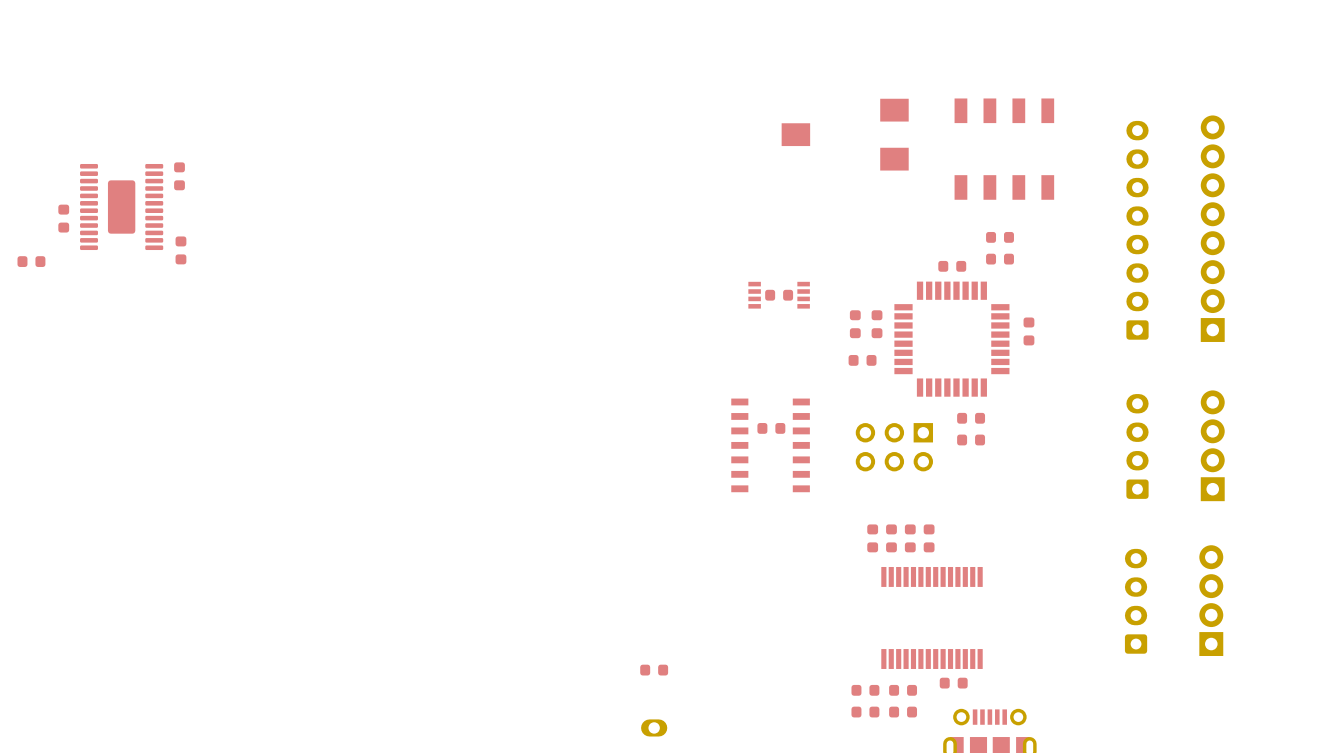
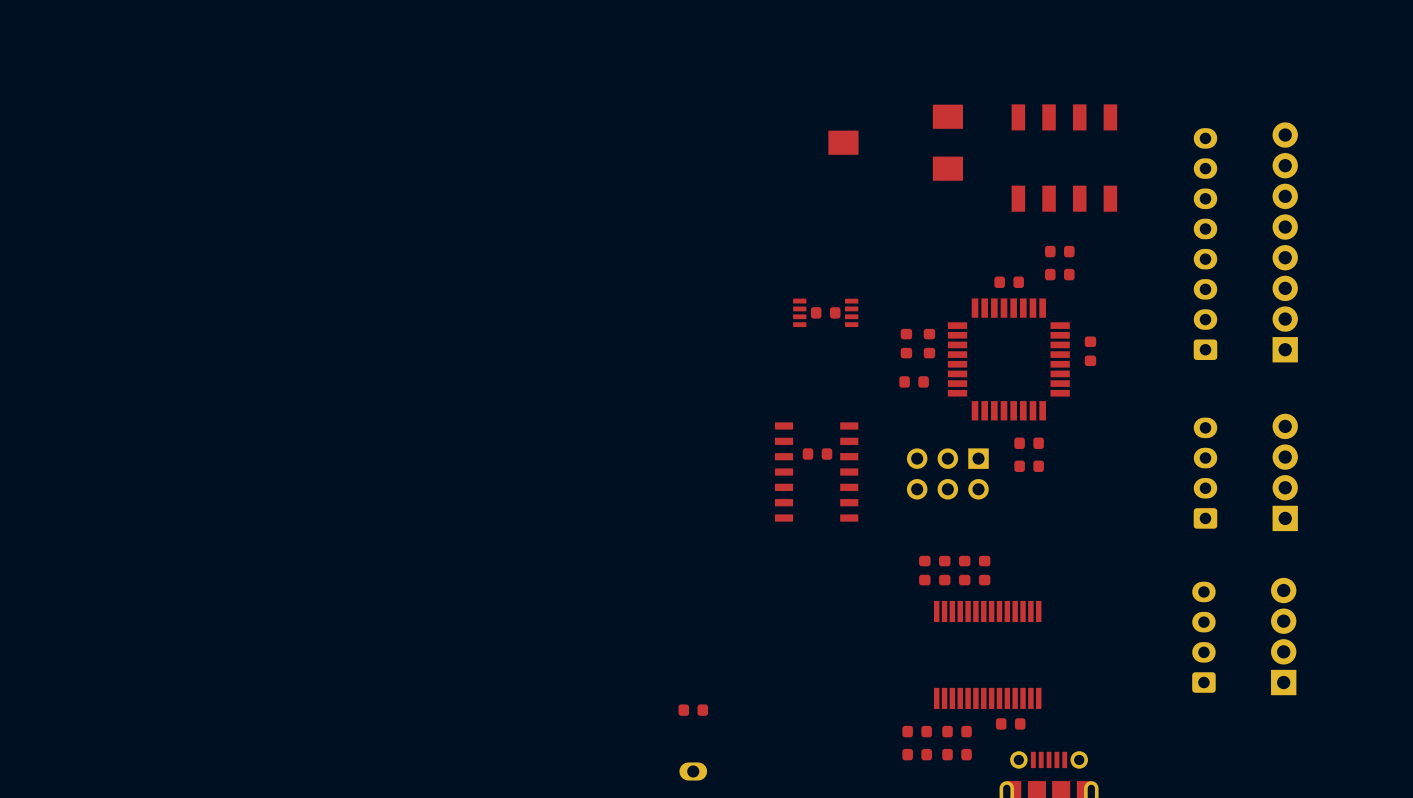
part: (179, 176) -> none
part: (121, 207) -> none
part: (63, 218) -> none
part: (180, 250) -> none
part: (31, 261) -> none

